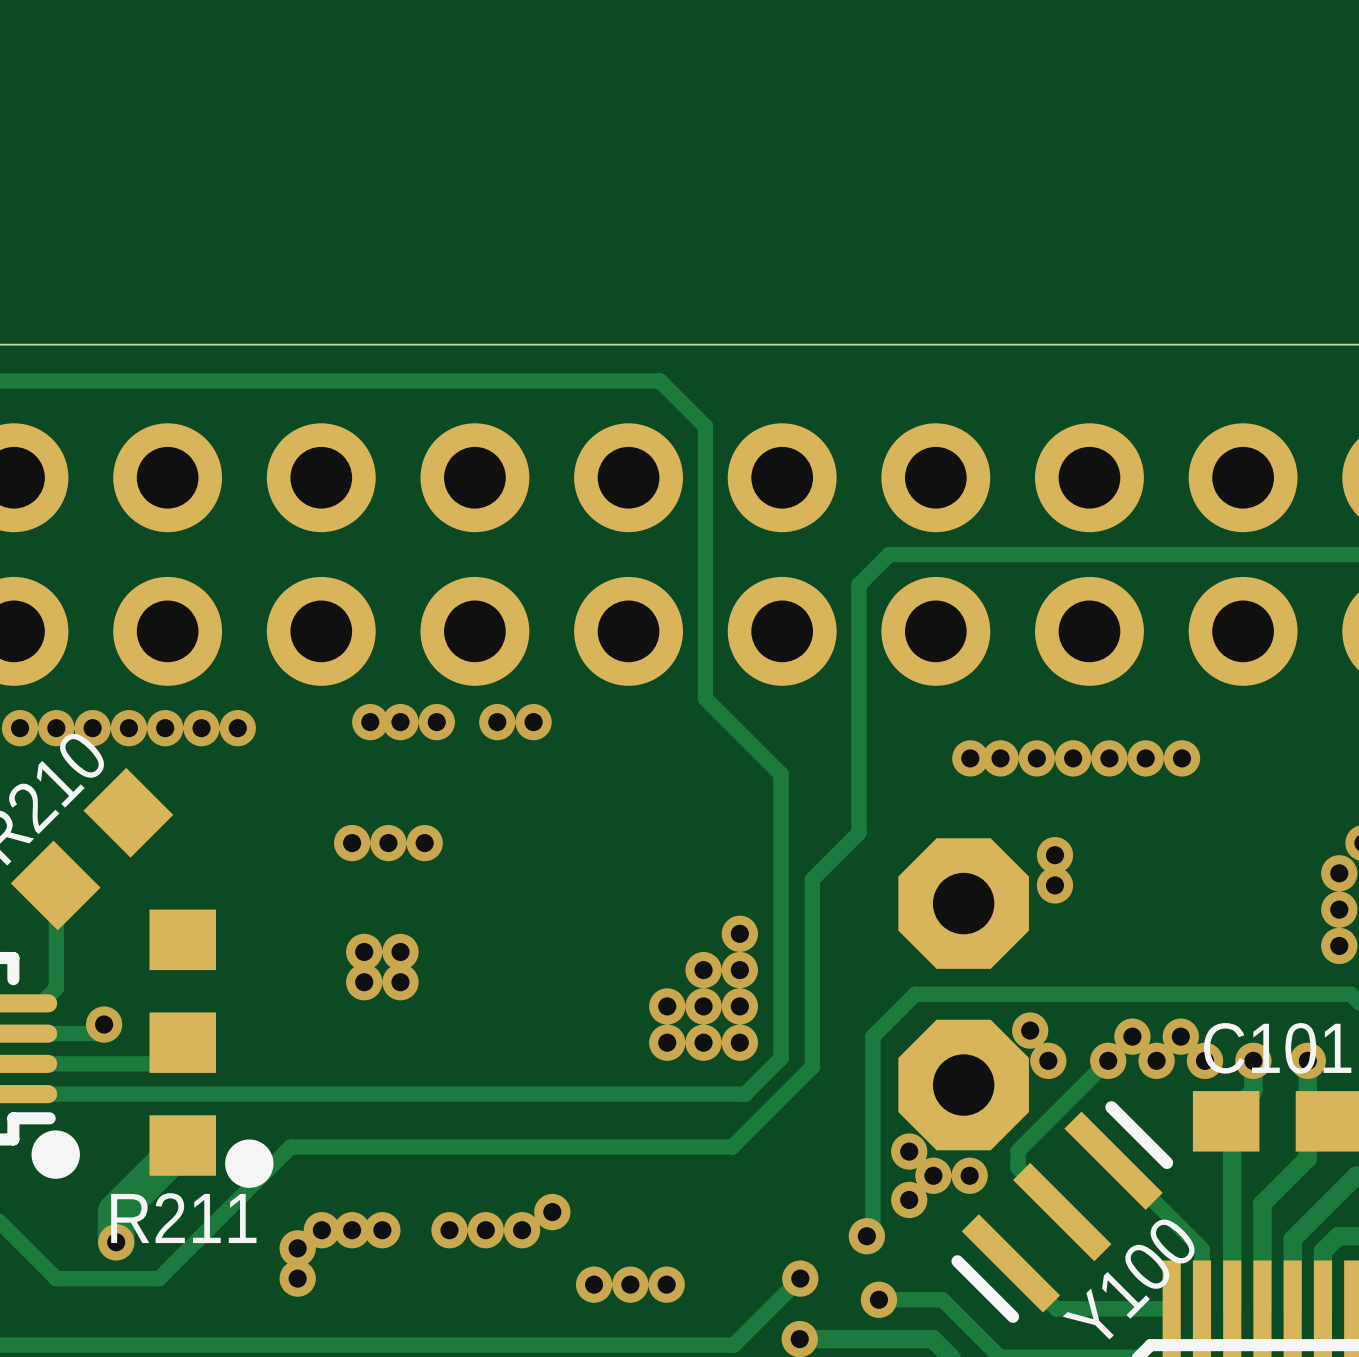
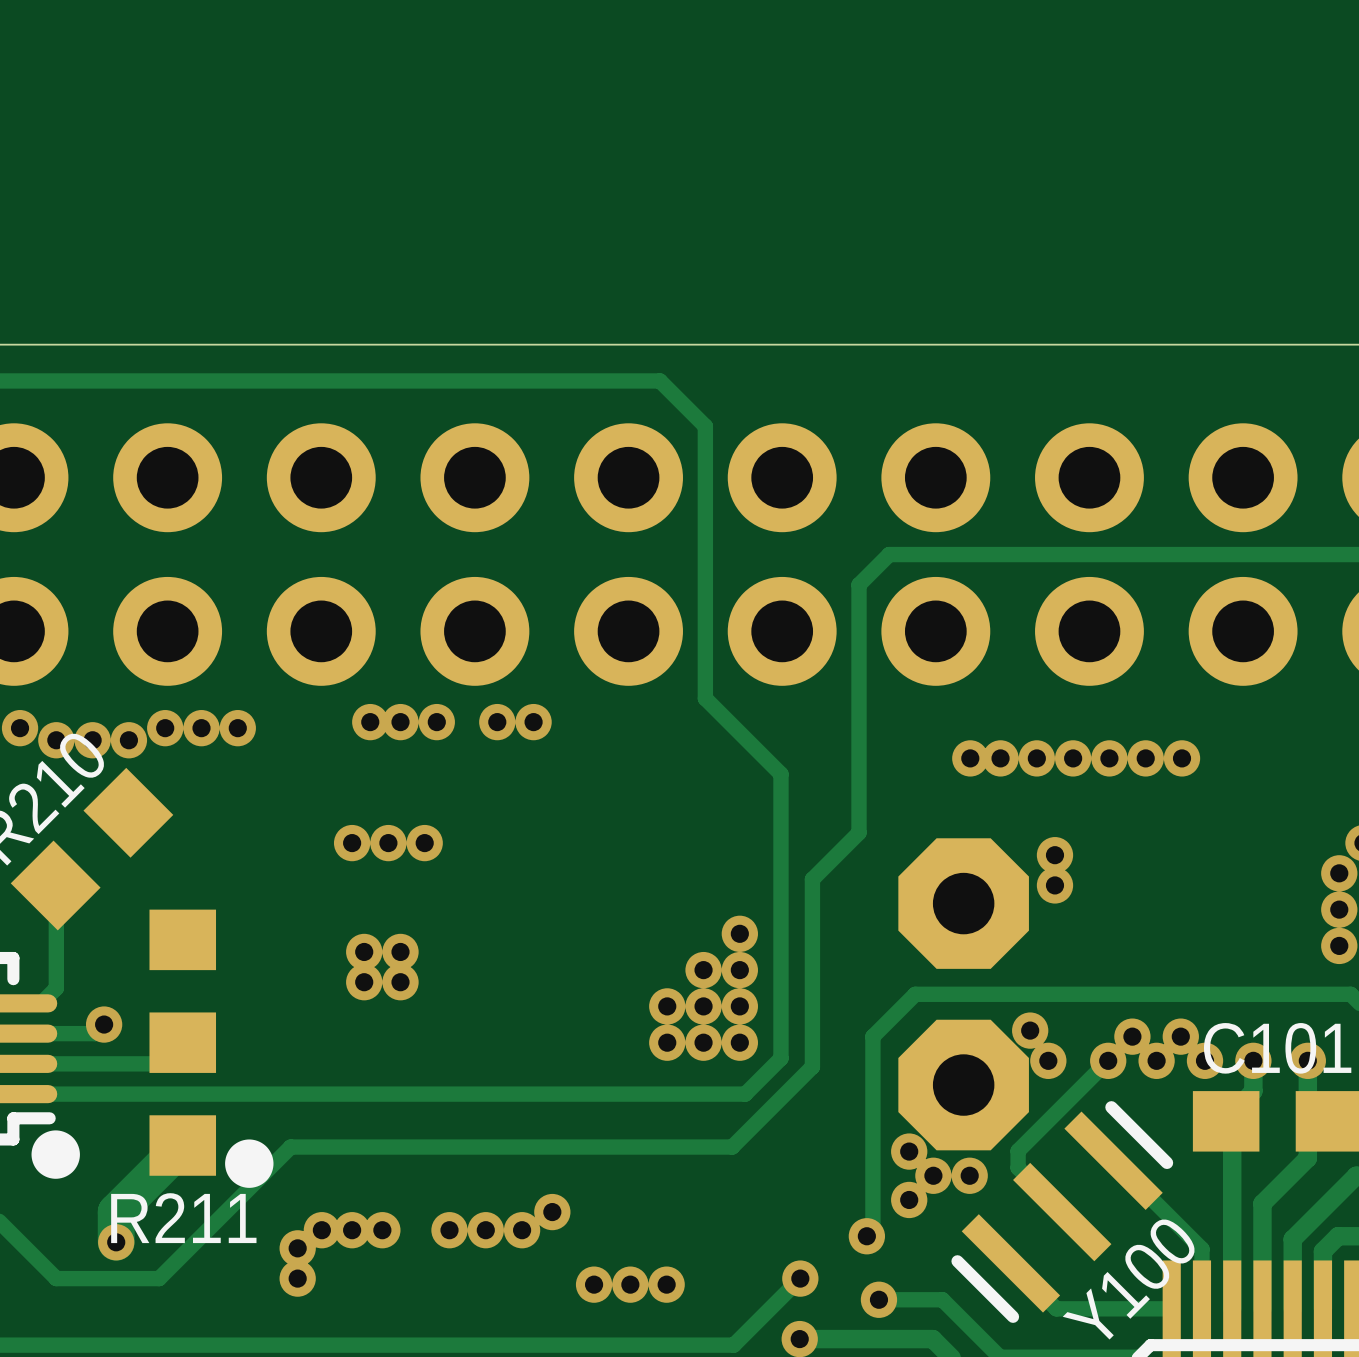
via position: (56, 728) -> (56, 740)
via position: (92, 728) -> (92, 740)
via position: (128, 728) -> (128, 740)

